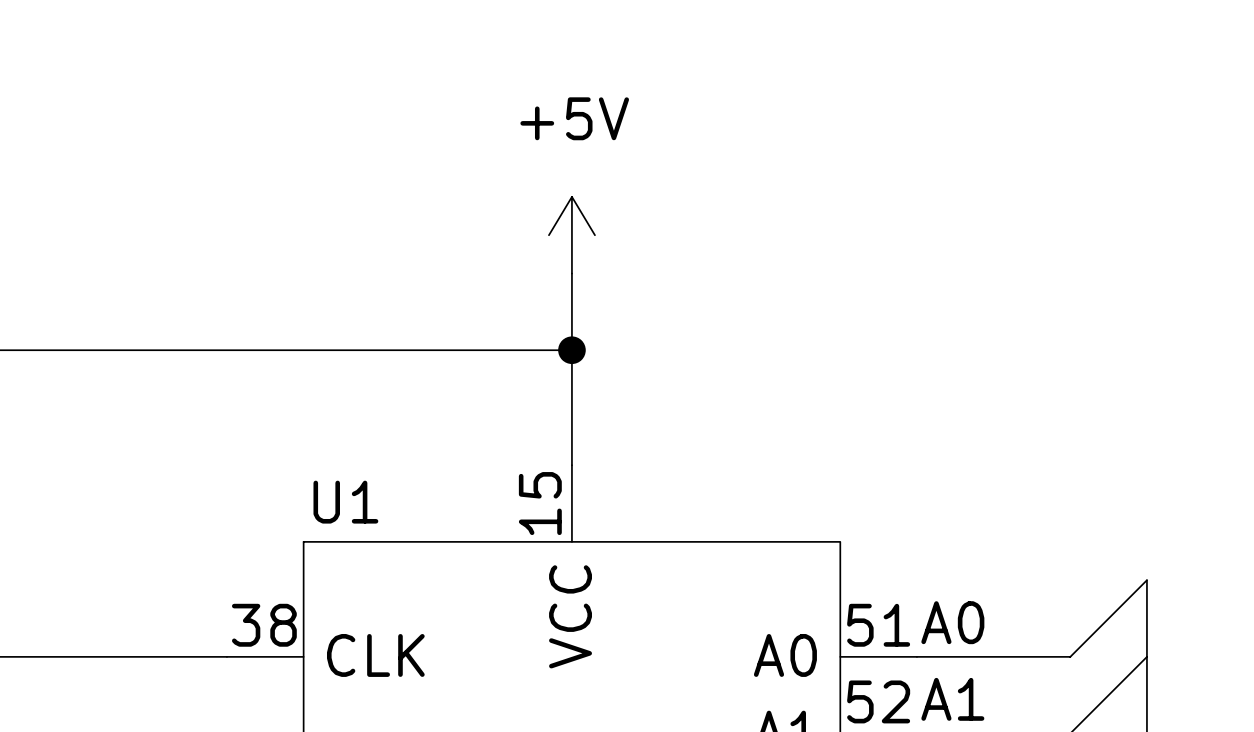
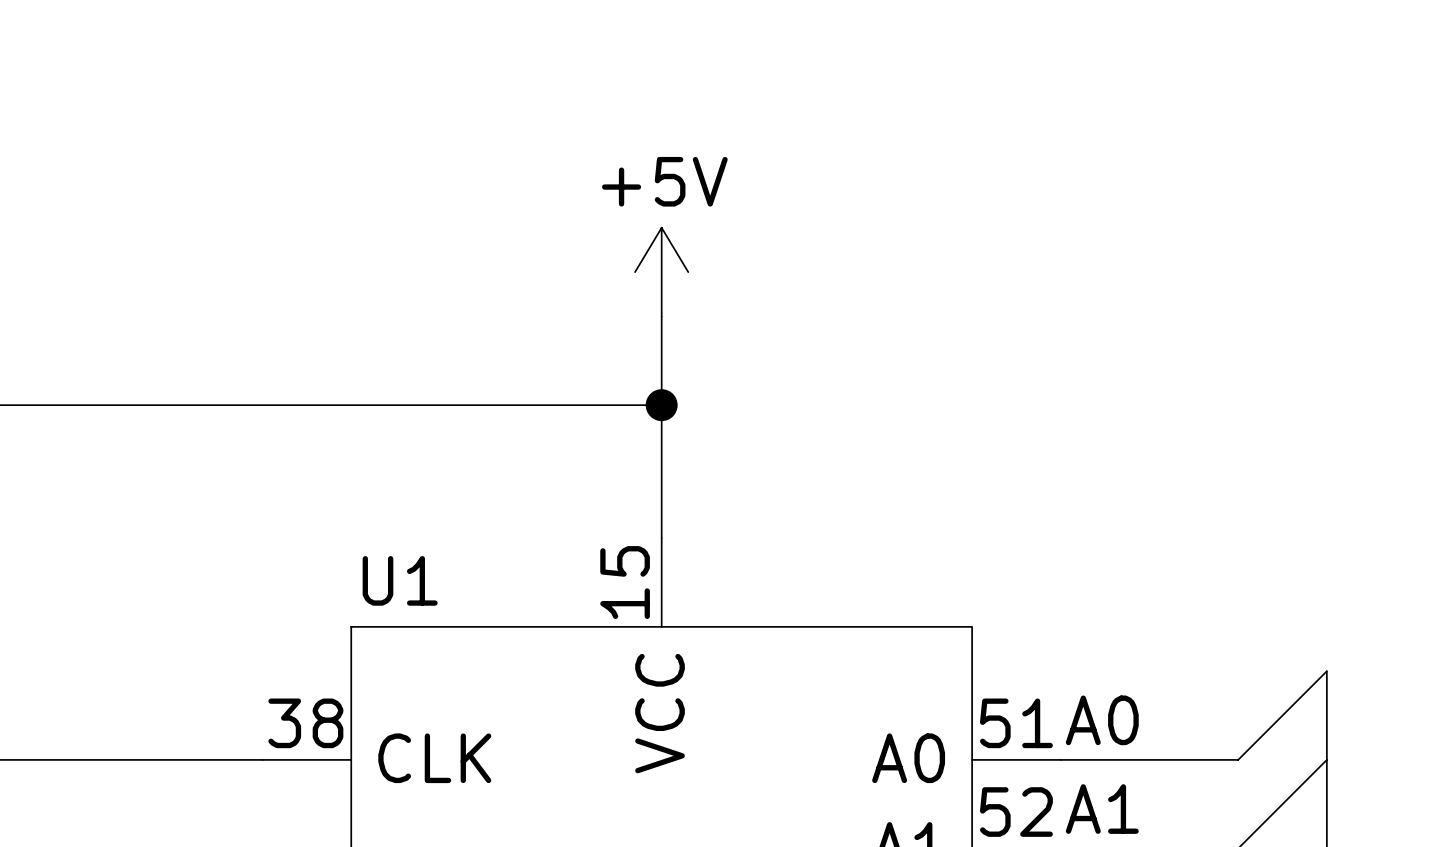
power symbol text position: +5V (574, 118) -> +5V (664, 181)

